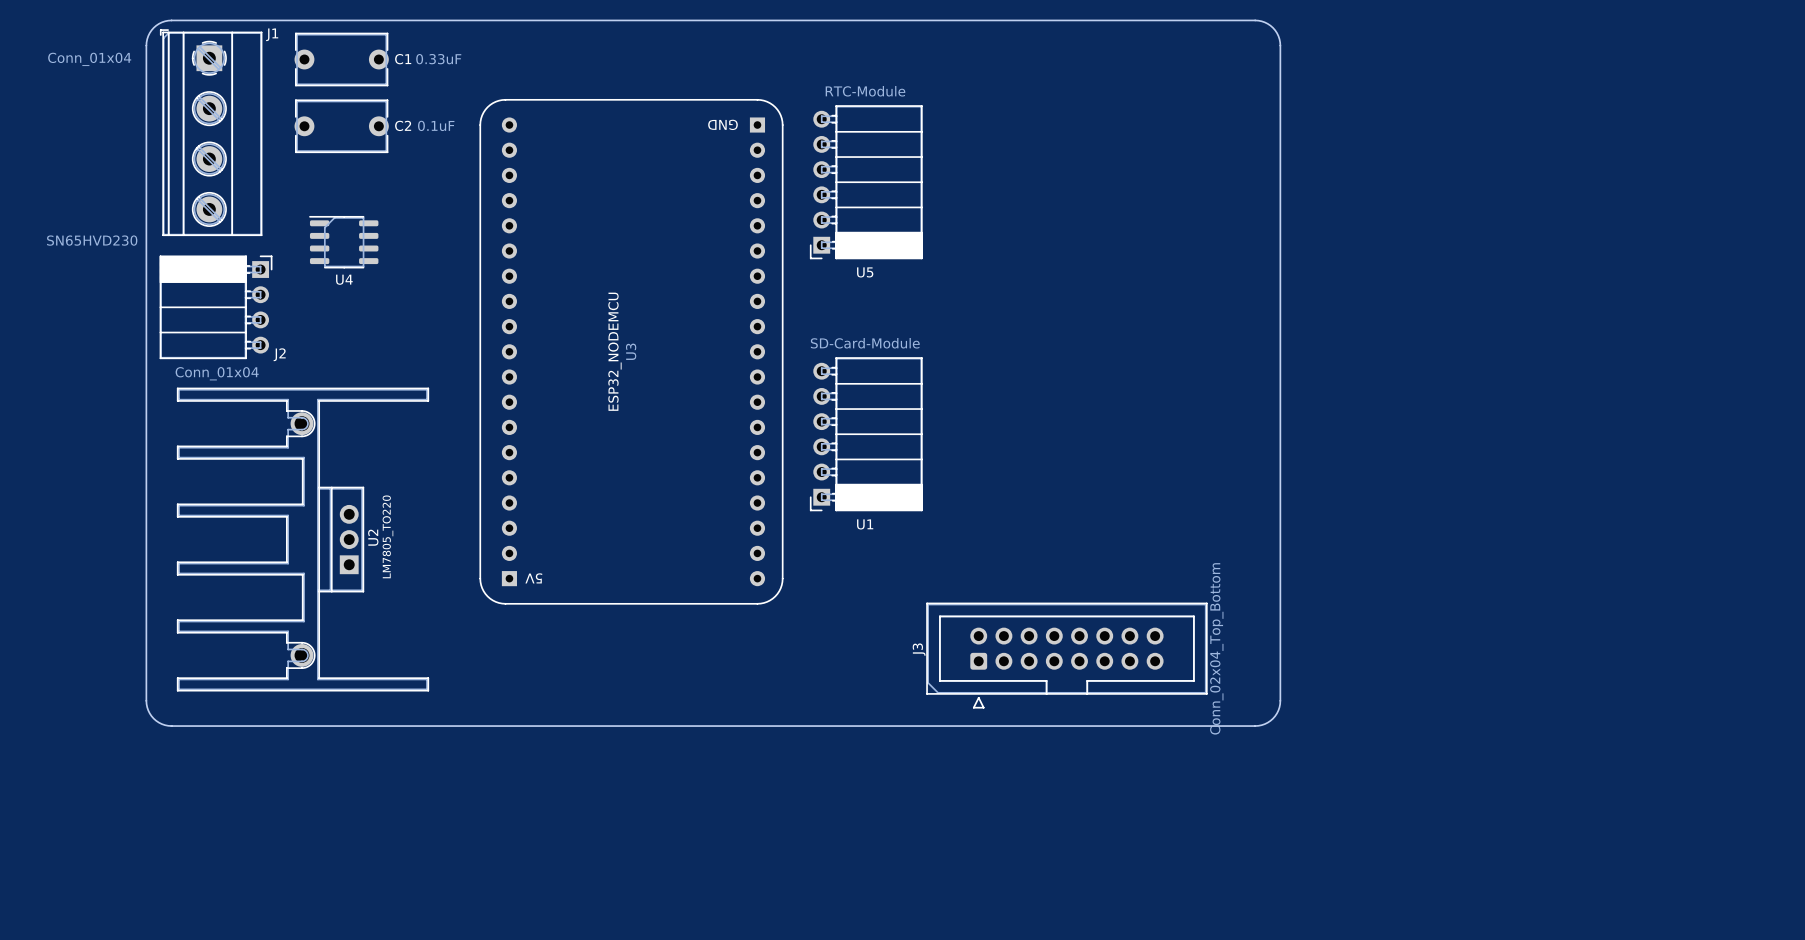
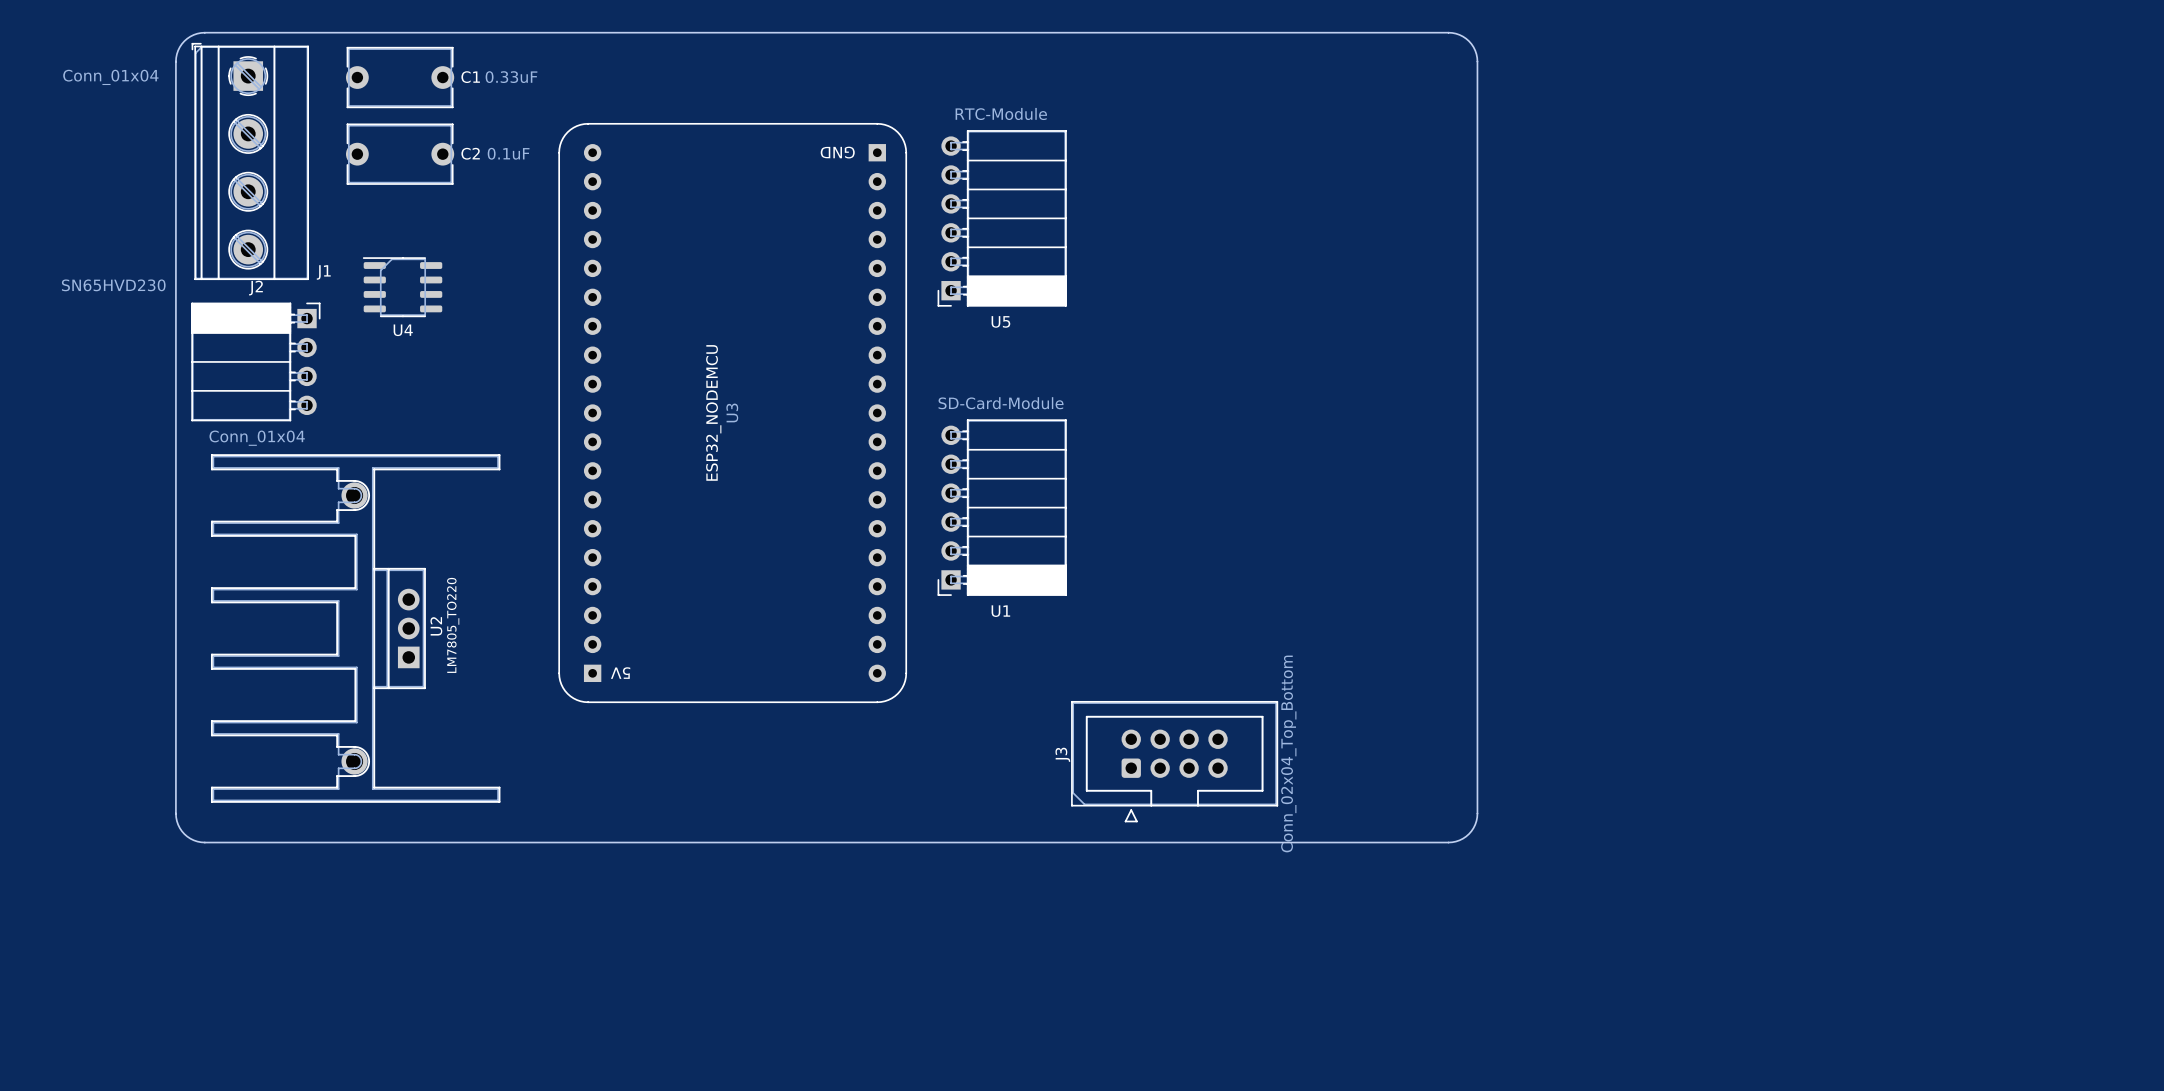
J1 name position: J1 (272, 34) -> J1 (323, 272)
J2 name position: J2 (279, 354) -> J2 (255, 288)
J3 footprint: [926, 602, 1208, 709] -> [1071, 701, 1279, 823]
J3 value position: Conn_02x04_Top_Bottom (1216, 648) -> Conn_02x04_Top_Bottom (1288, 753)

